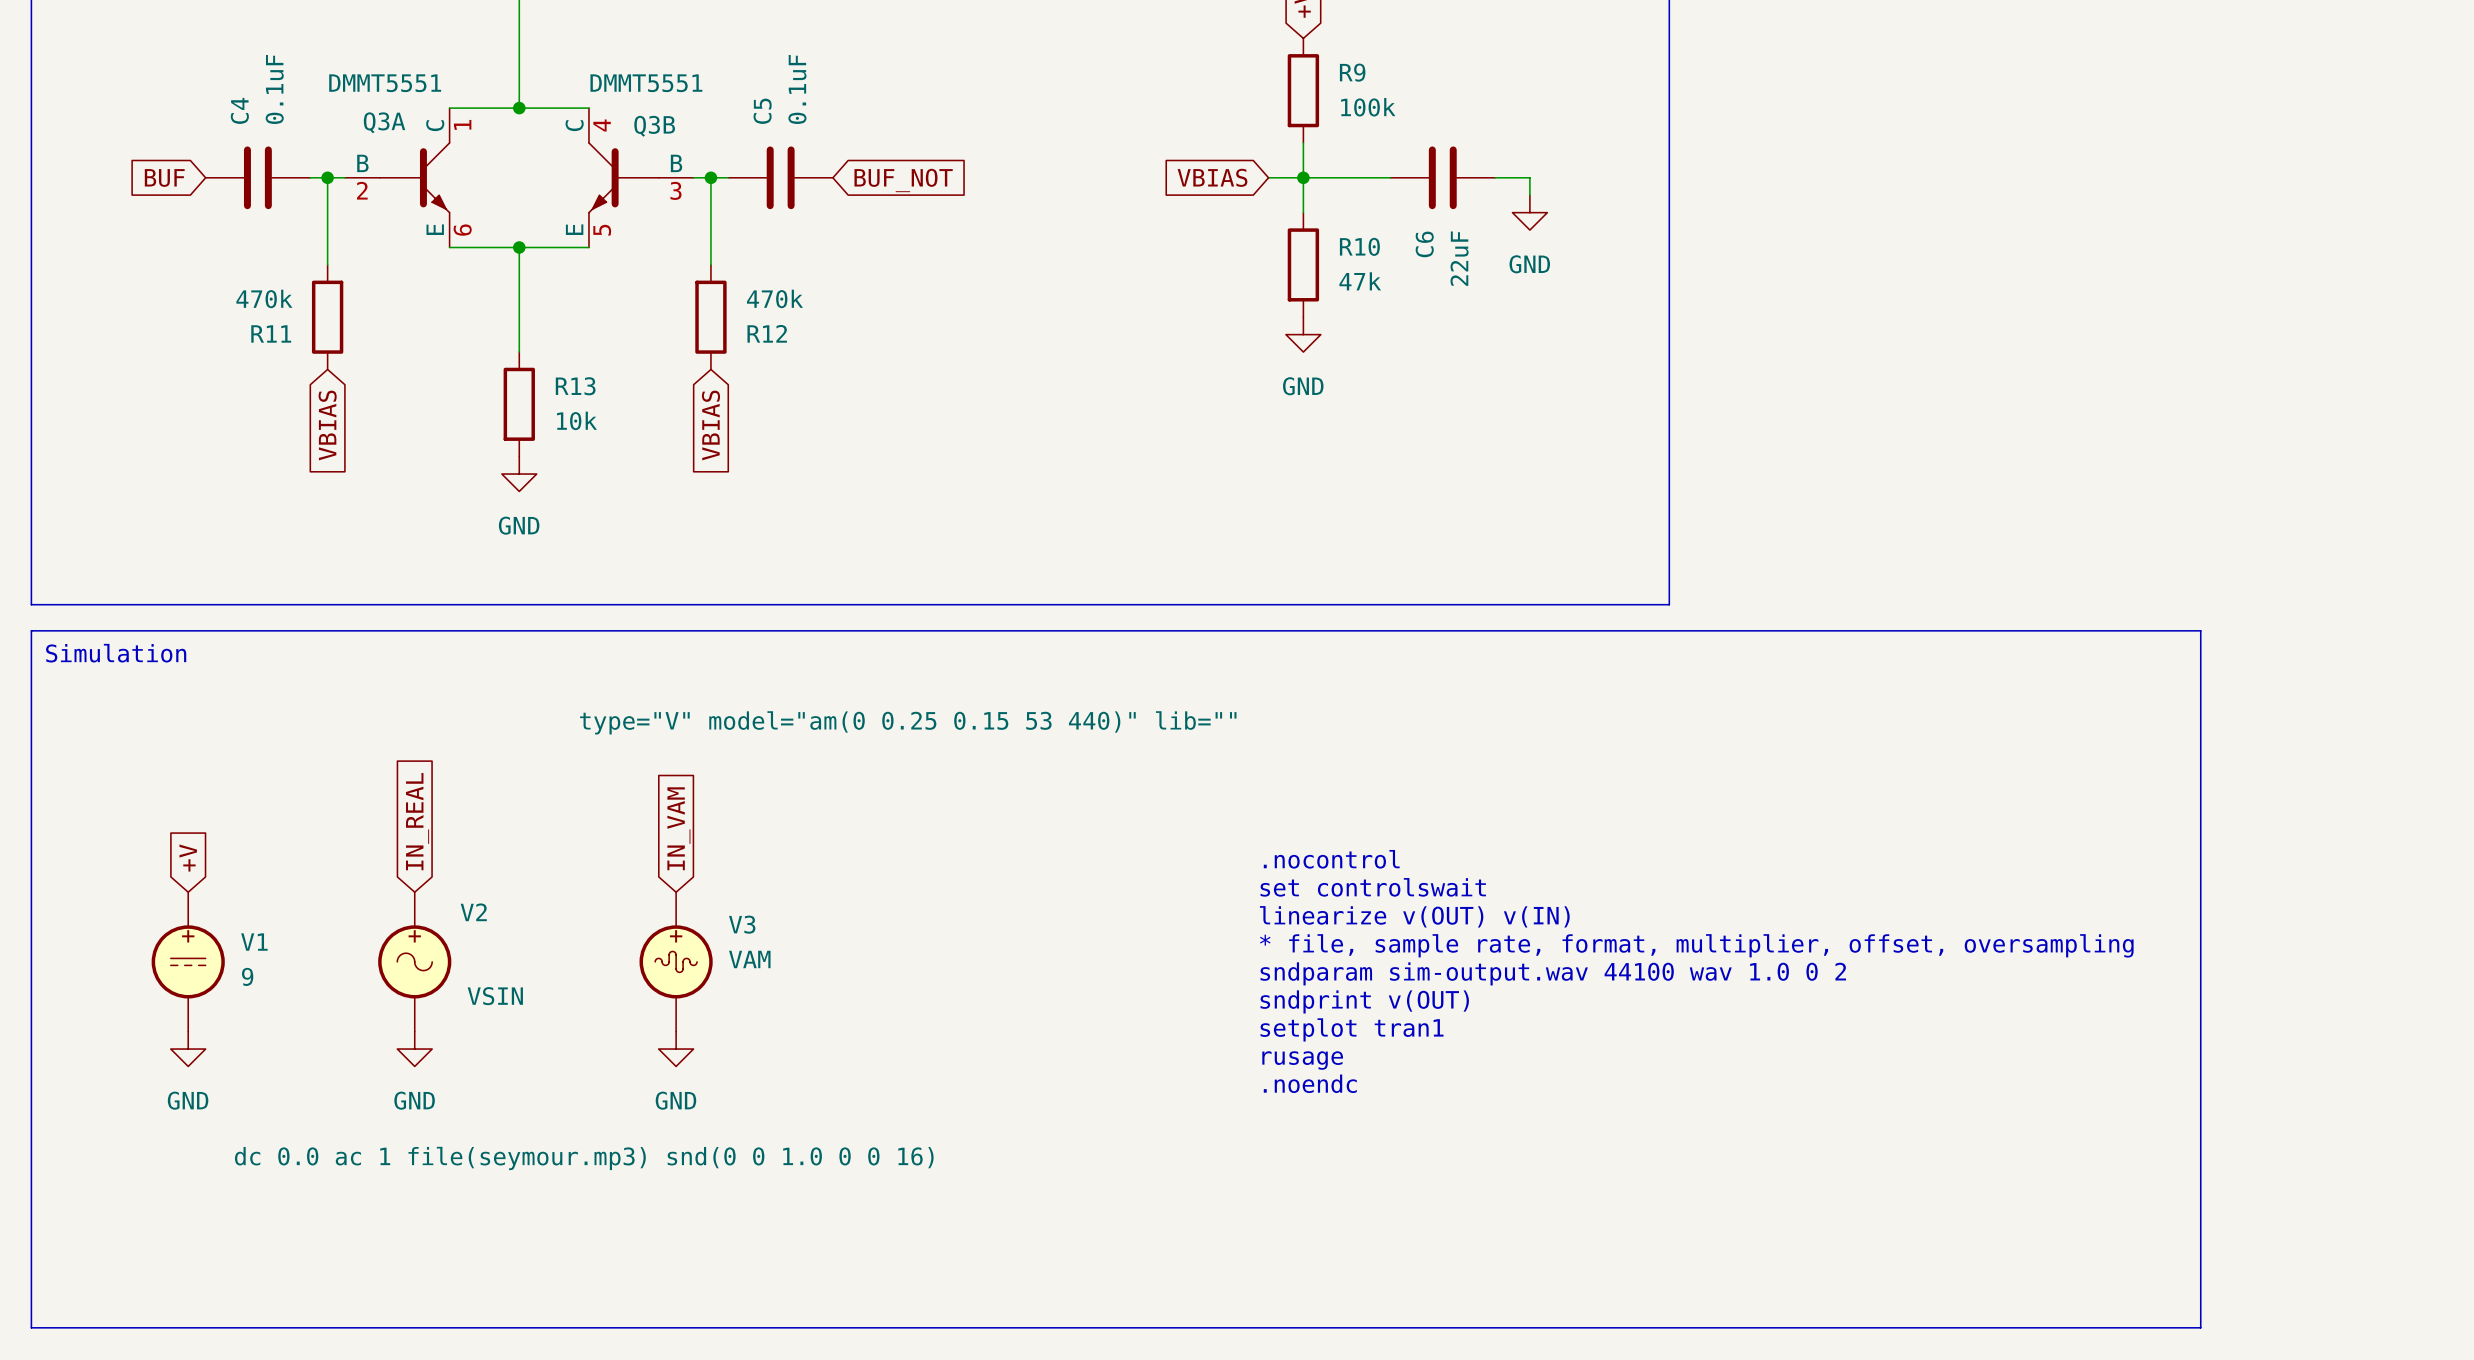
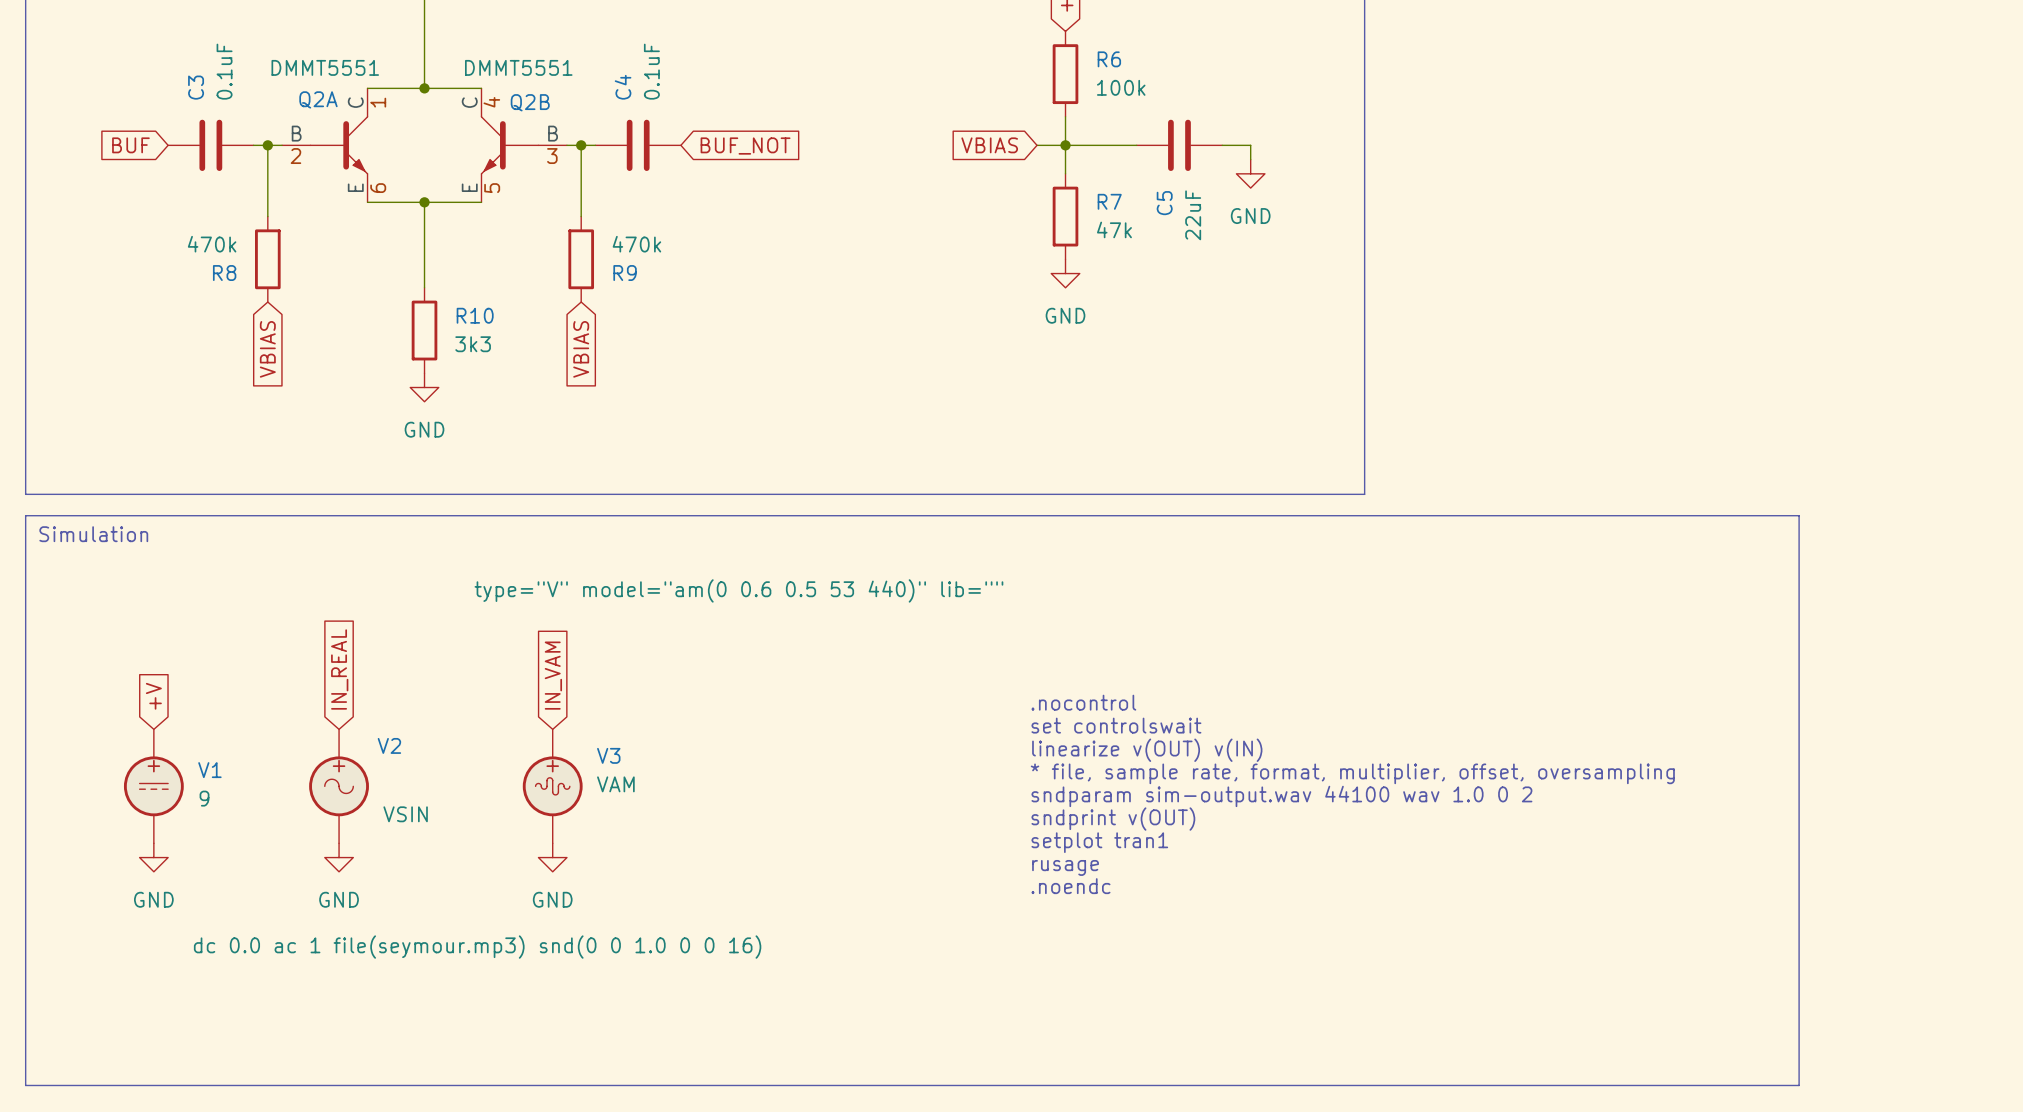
R9 name: R9 (1352, 72) -> R6 (1109, 59)
C4 name: C4 (239, 110) -> C3 (196, 87)
C5 name: C5 (762, 111) -> C4 (623, 87)
Q3A name: Q3A (384, 122) -> Q2A (318, 99)
Q3B name: Q3B (654, 126) -> Q2B (530, 102)
C6 name: C6 (1424, 244) -> C5 (1164, 203)
R10 name: R10 (1359, 246) -> R7 (1109, 201)
R11 name: R11 (271, 333) -> R8 (224, 273)
R12 name: R12 (767, 333) -> R9 (625, 273)
R13 name: R13 (575, 386) -> R10 (475, 315)
R13 value: 10k (576, 420) -> 3k3 (473, 344)
V3 text: type="V" model="am(0 0.25 0.15 53 440)" lib="" (908, 722) -> type="V" model="am(0 0.6 0.5 53 440)" lib="" (738, 590)

